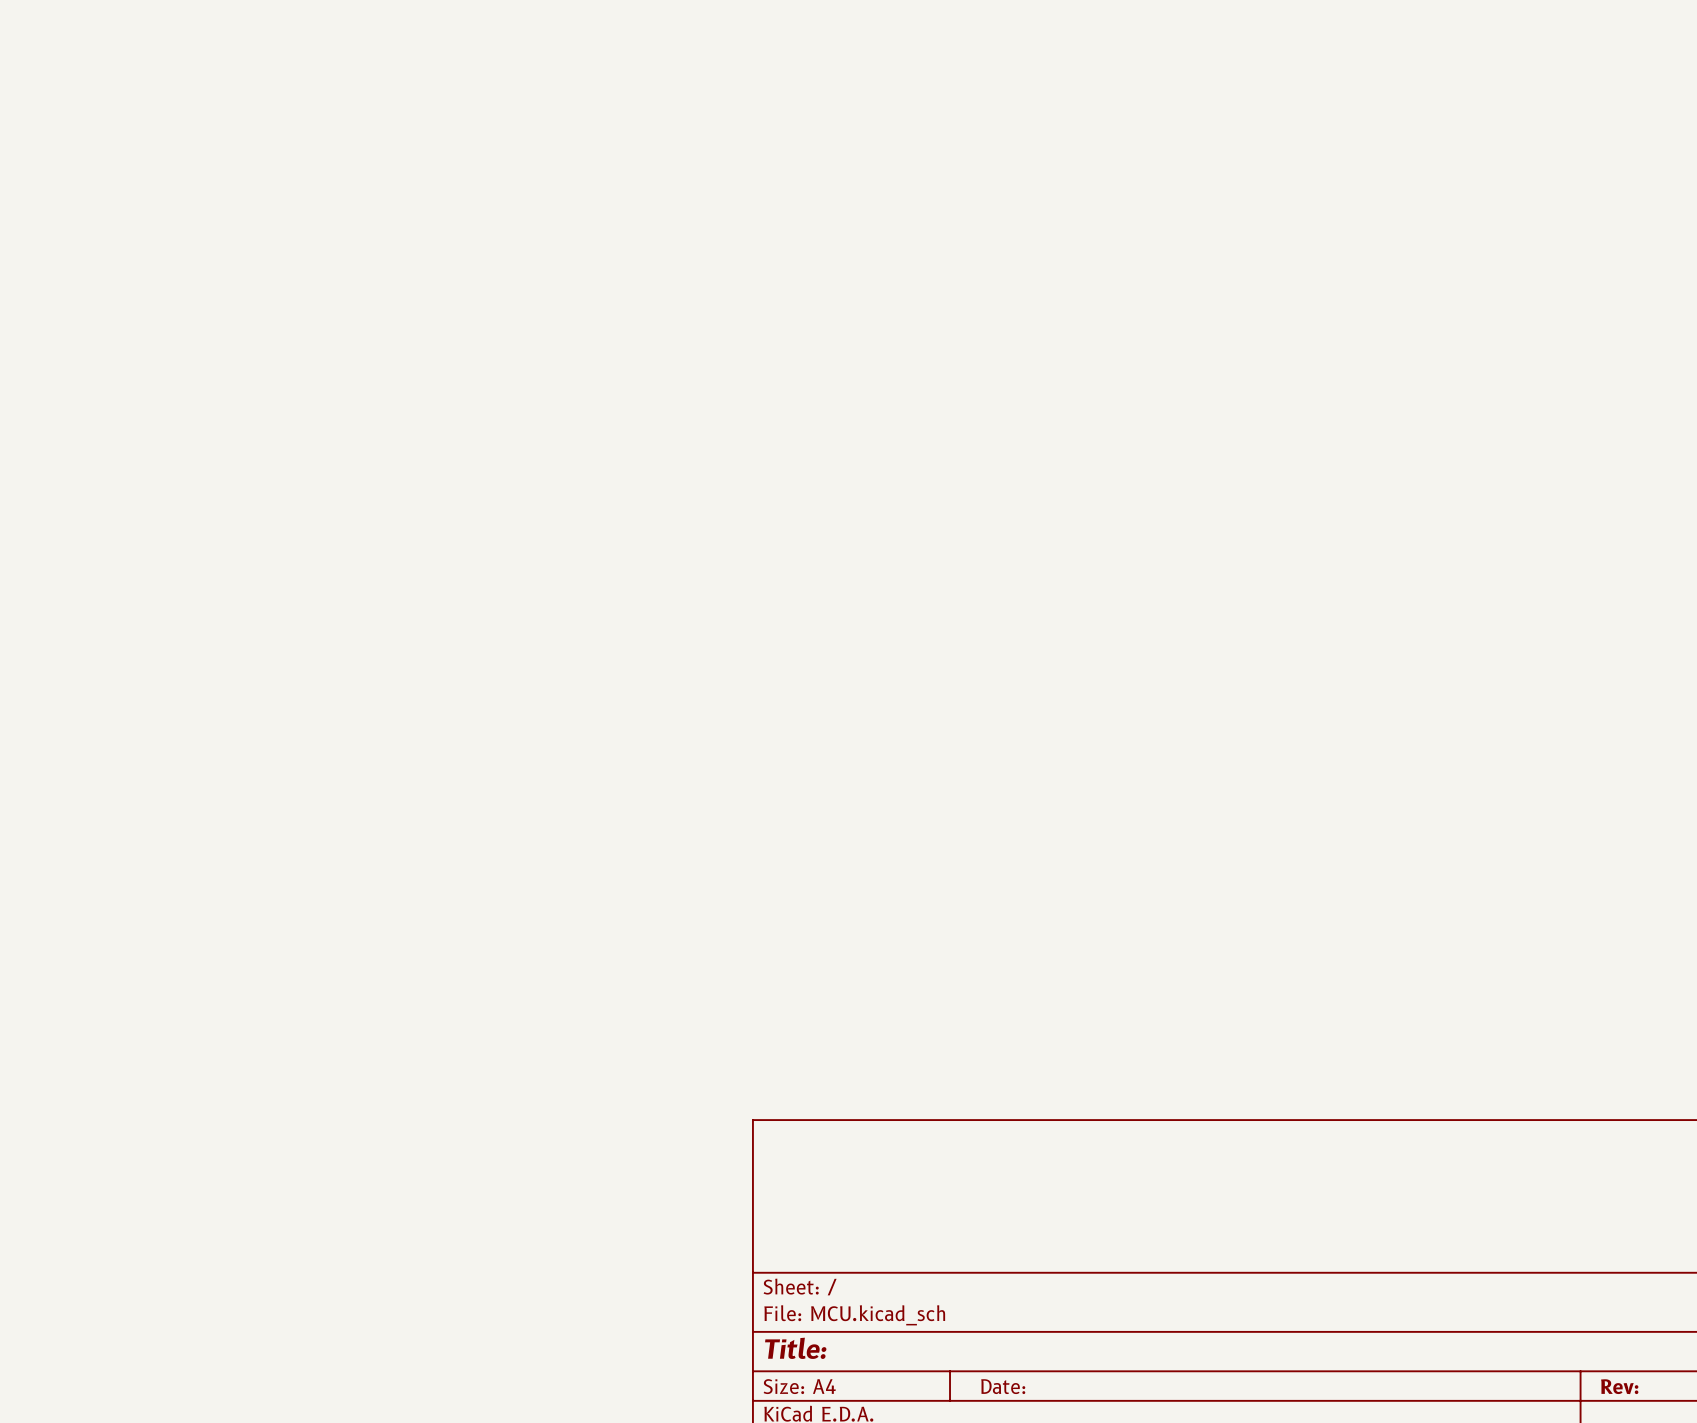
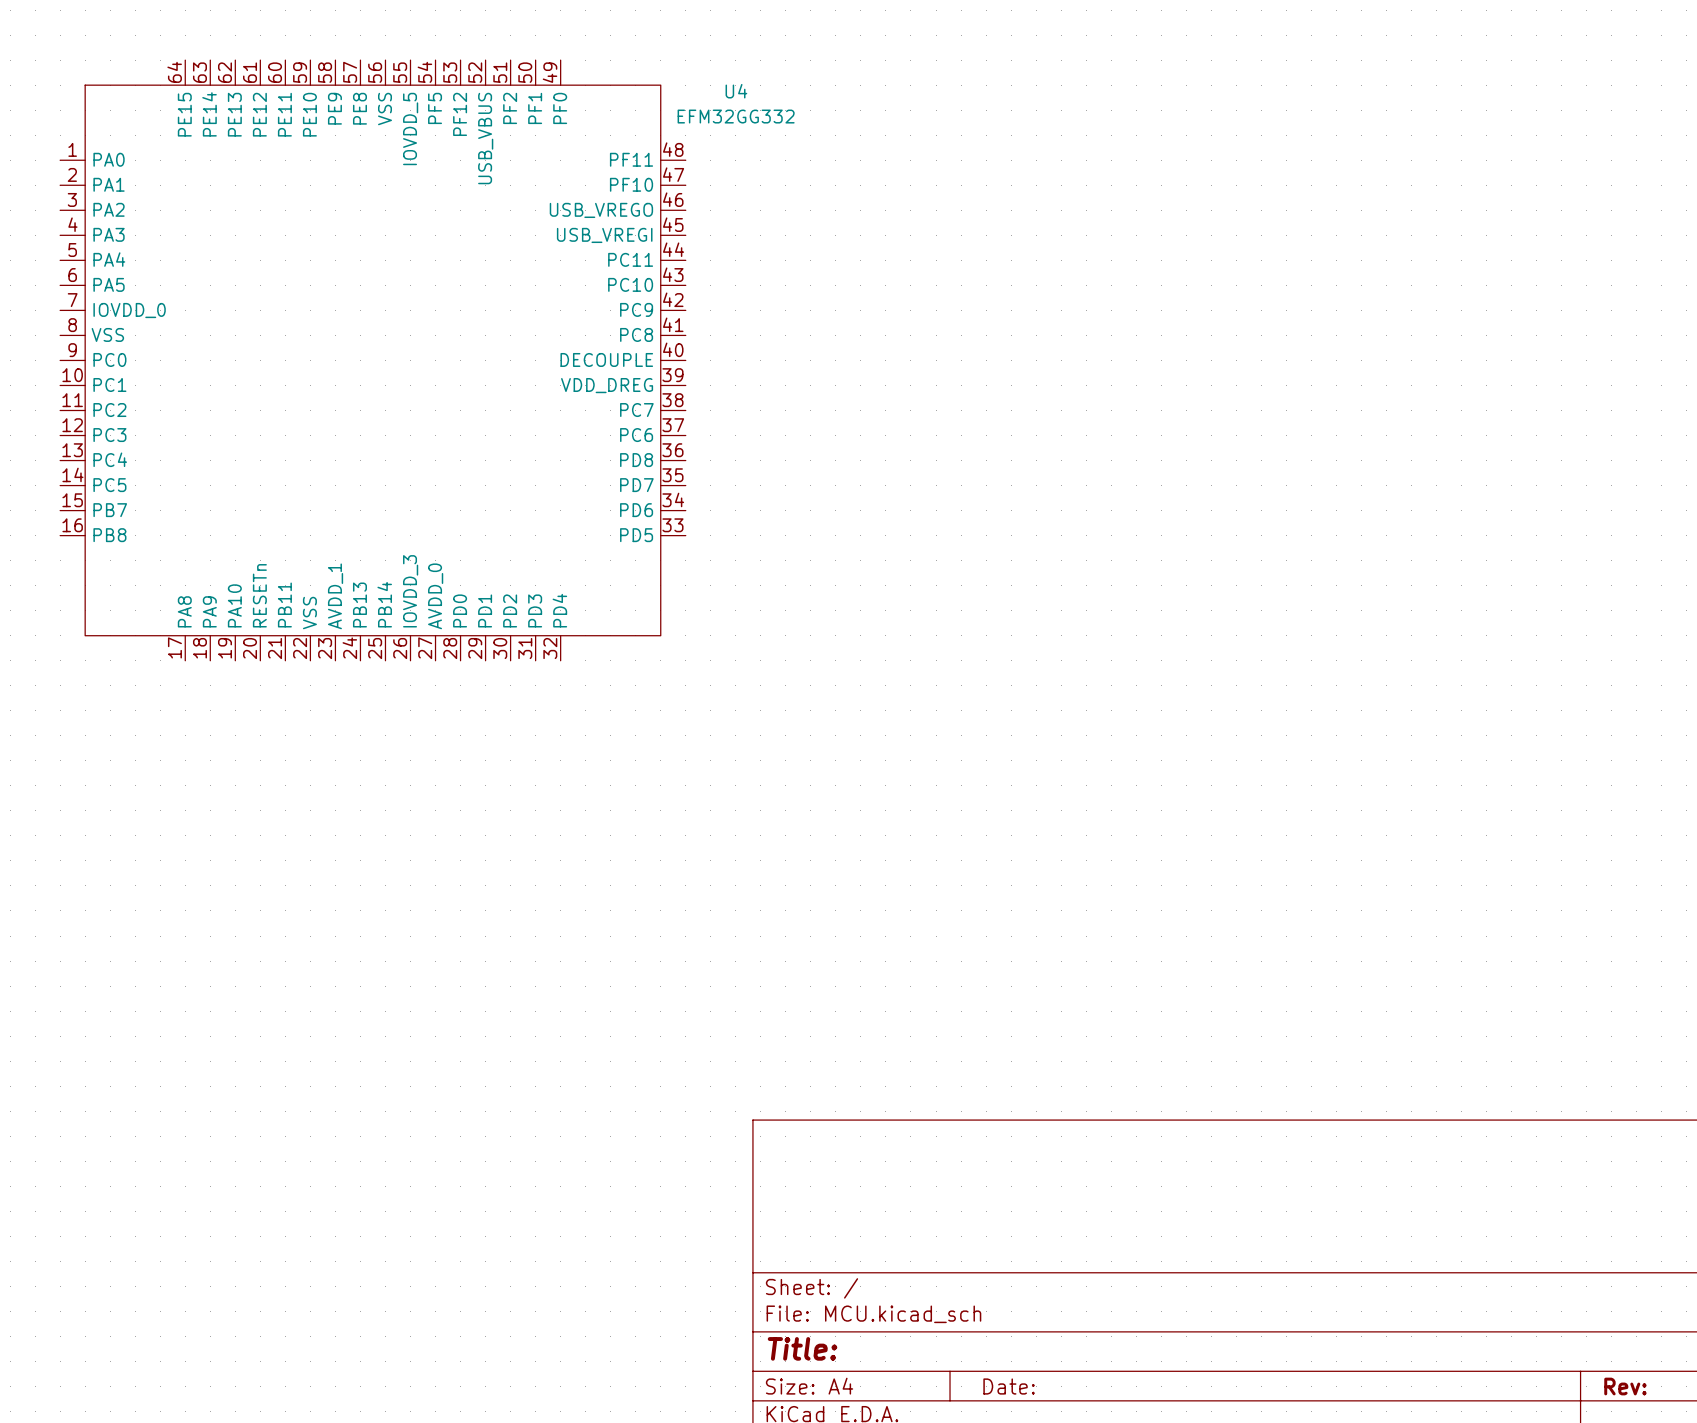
U4: none -> EFM32GG332 (372, 360)

